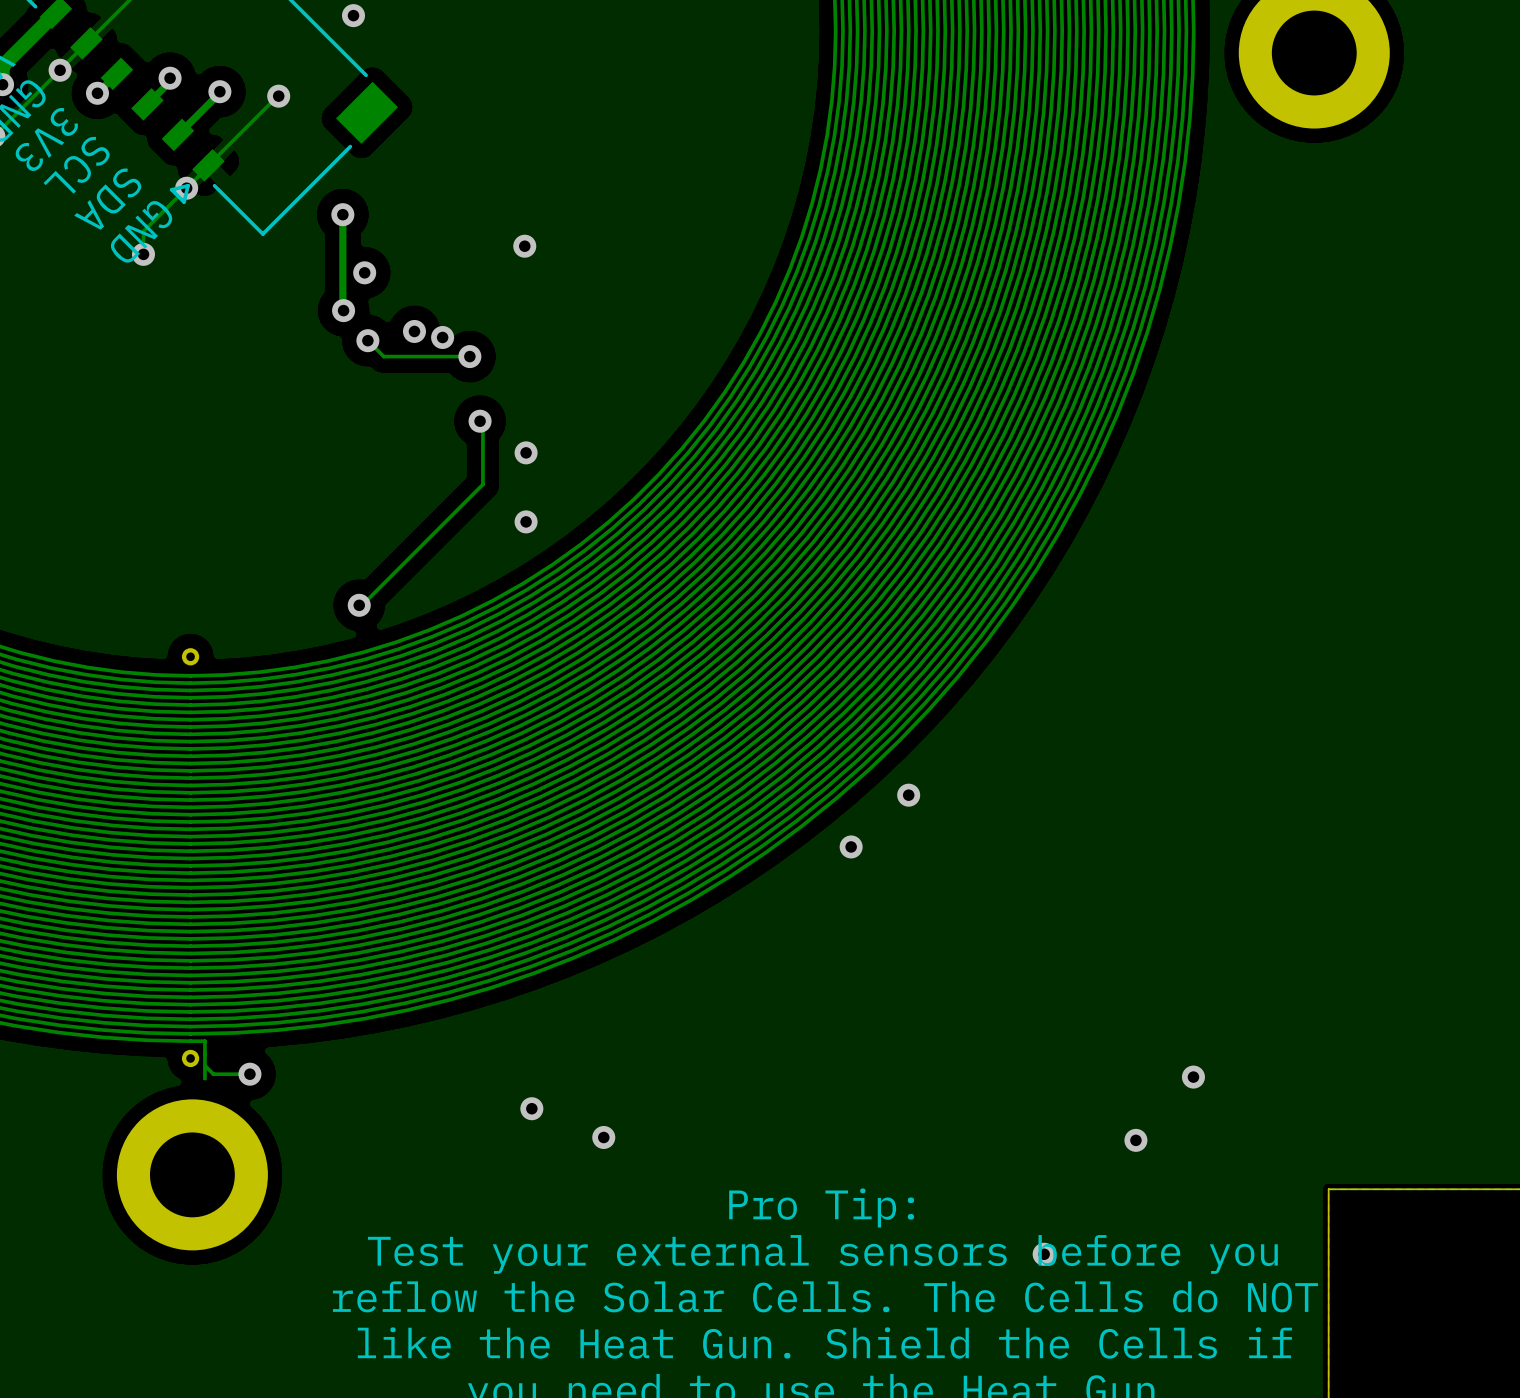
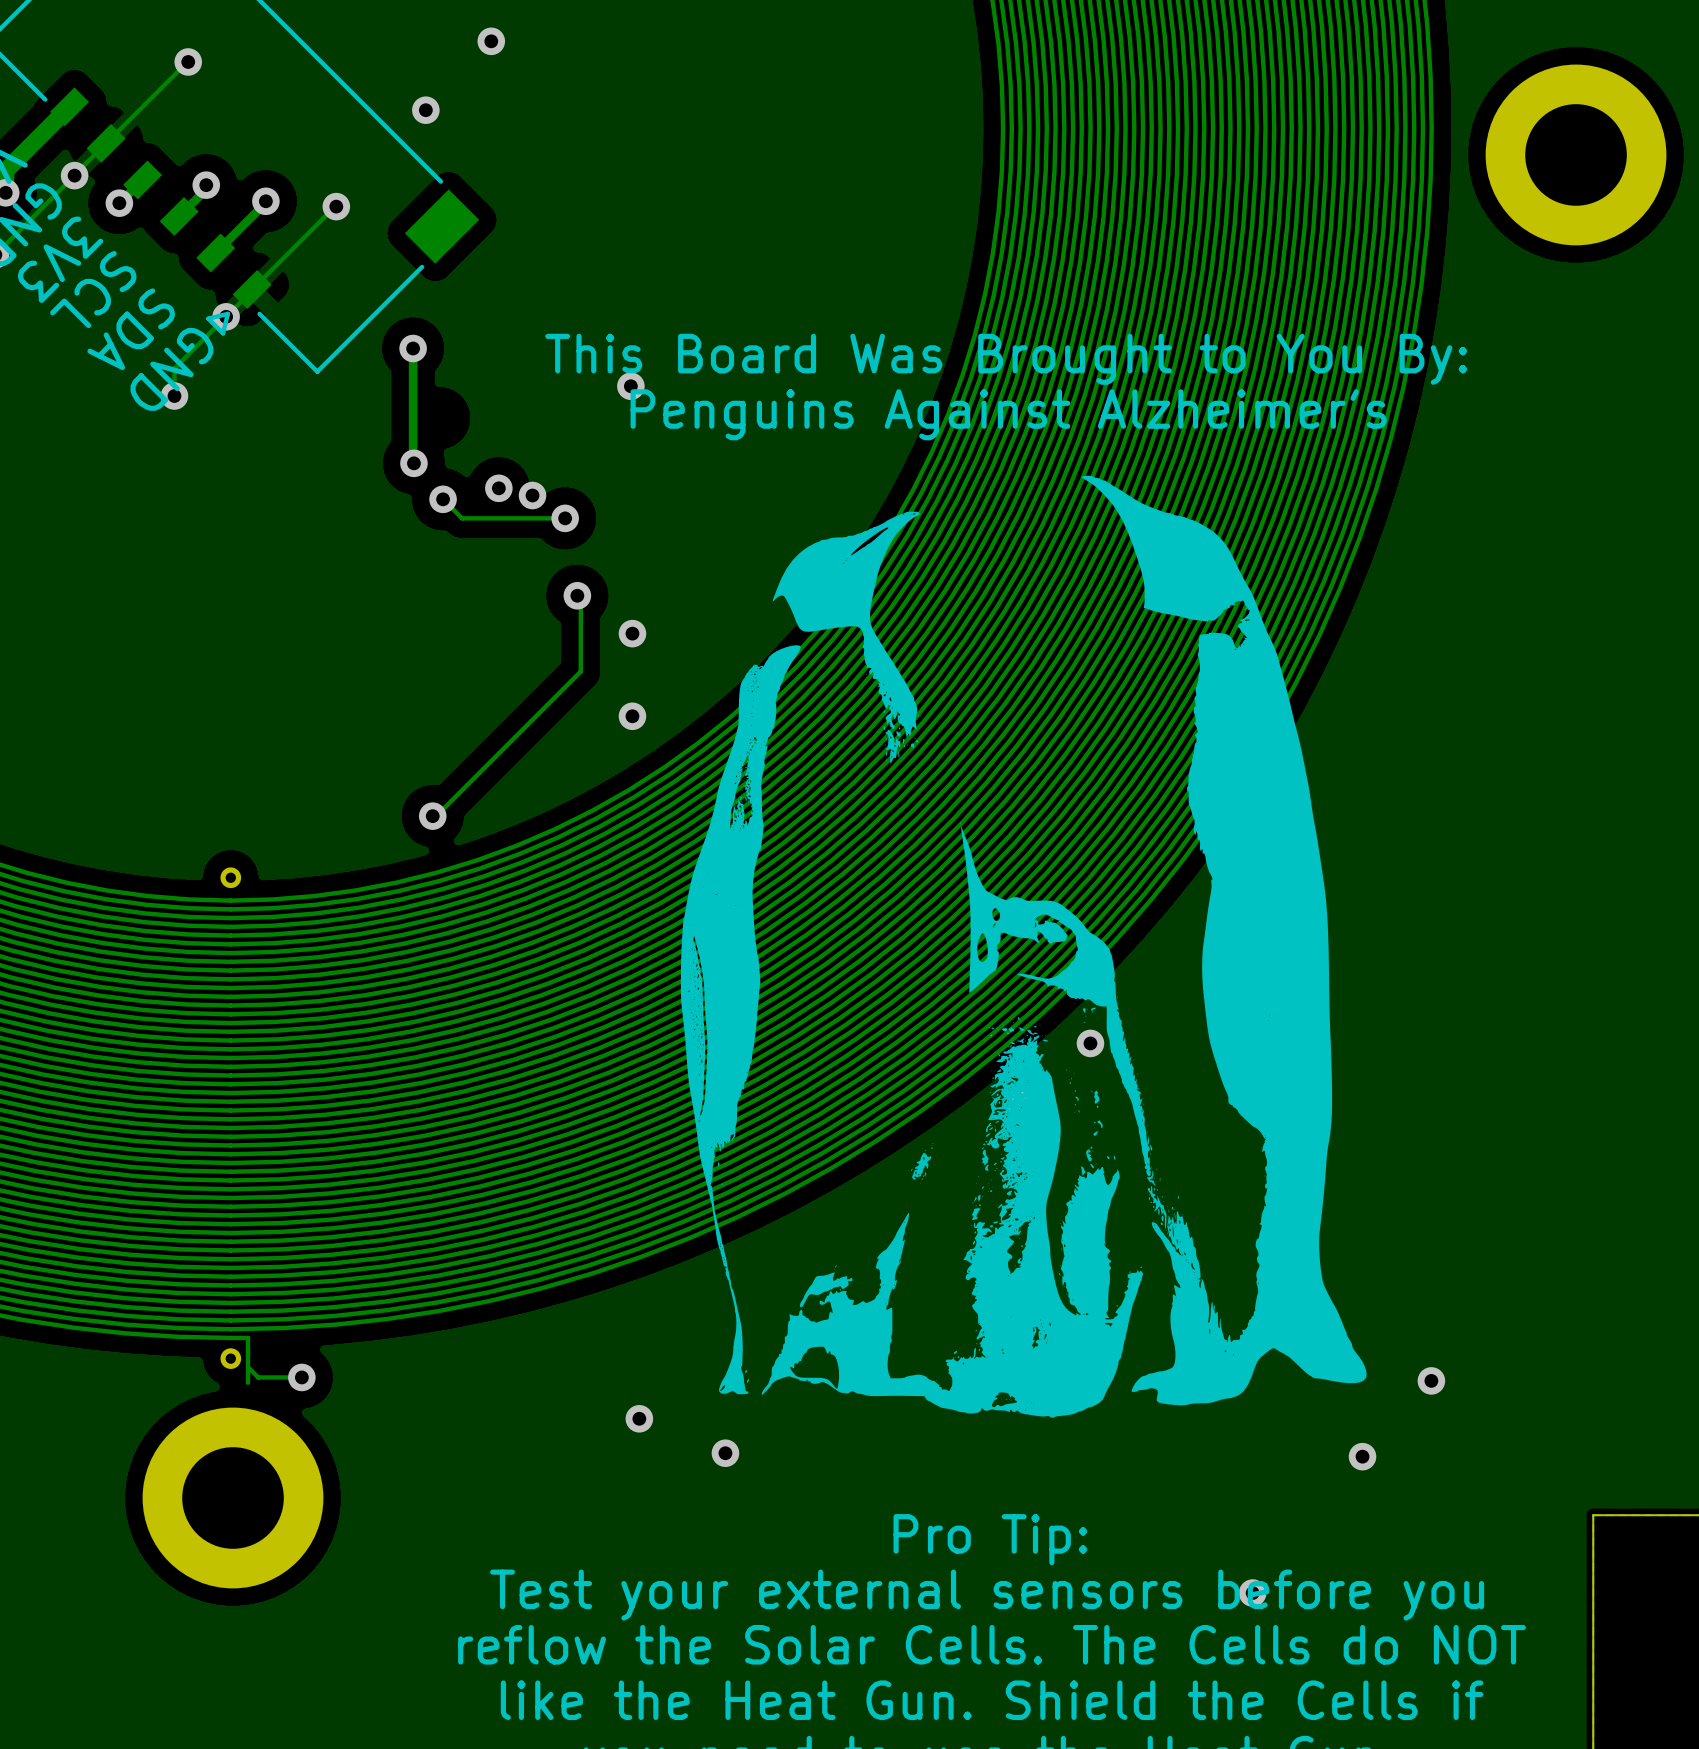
text: none -> This Board Was Brought to You By: (1006, 359)
text: none -> Penguins Against Alzheimer's (1008, 414)
via: (364, 272) -> none
drawing: none -> [680, 475, 1367, 1418]

